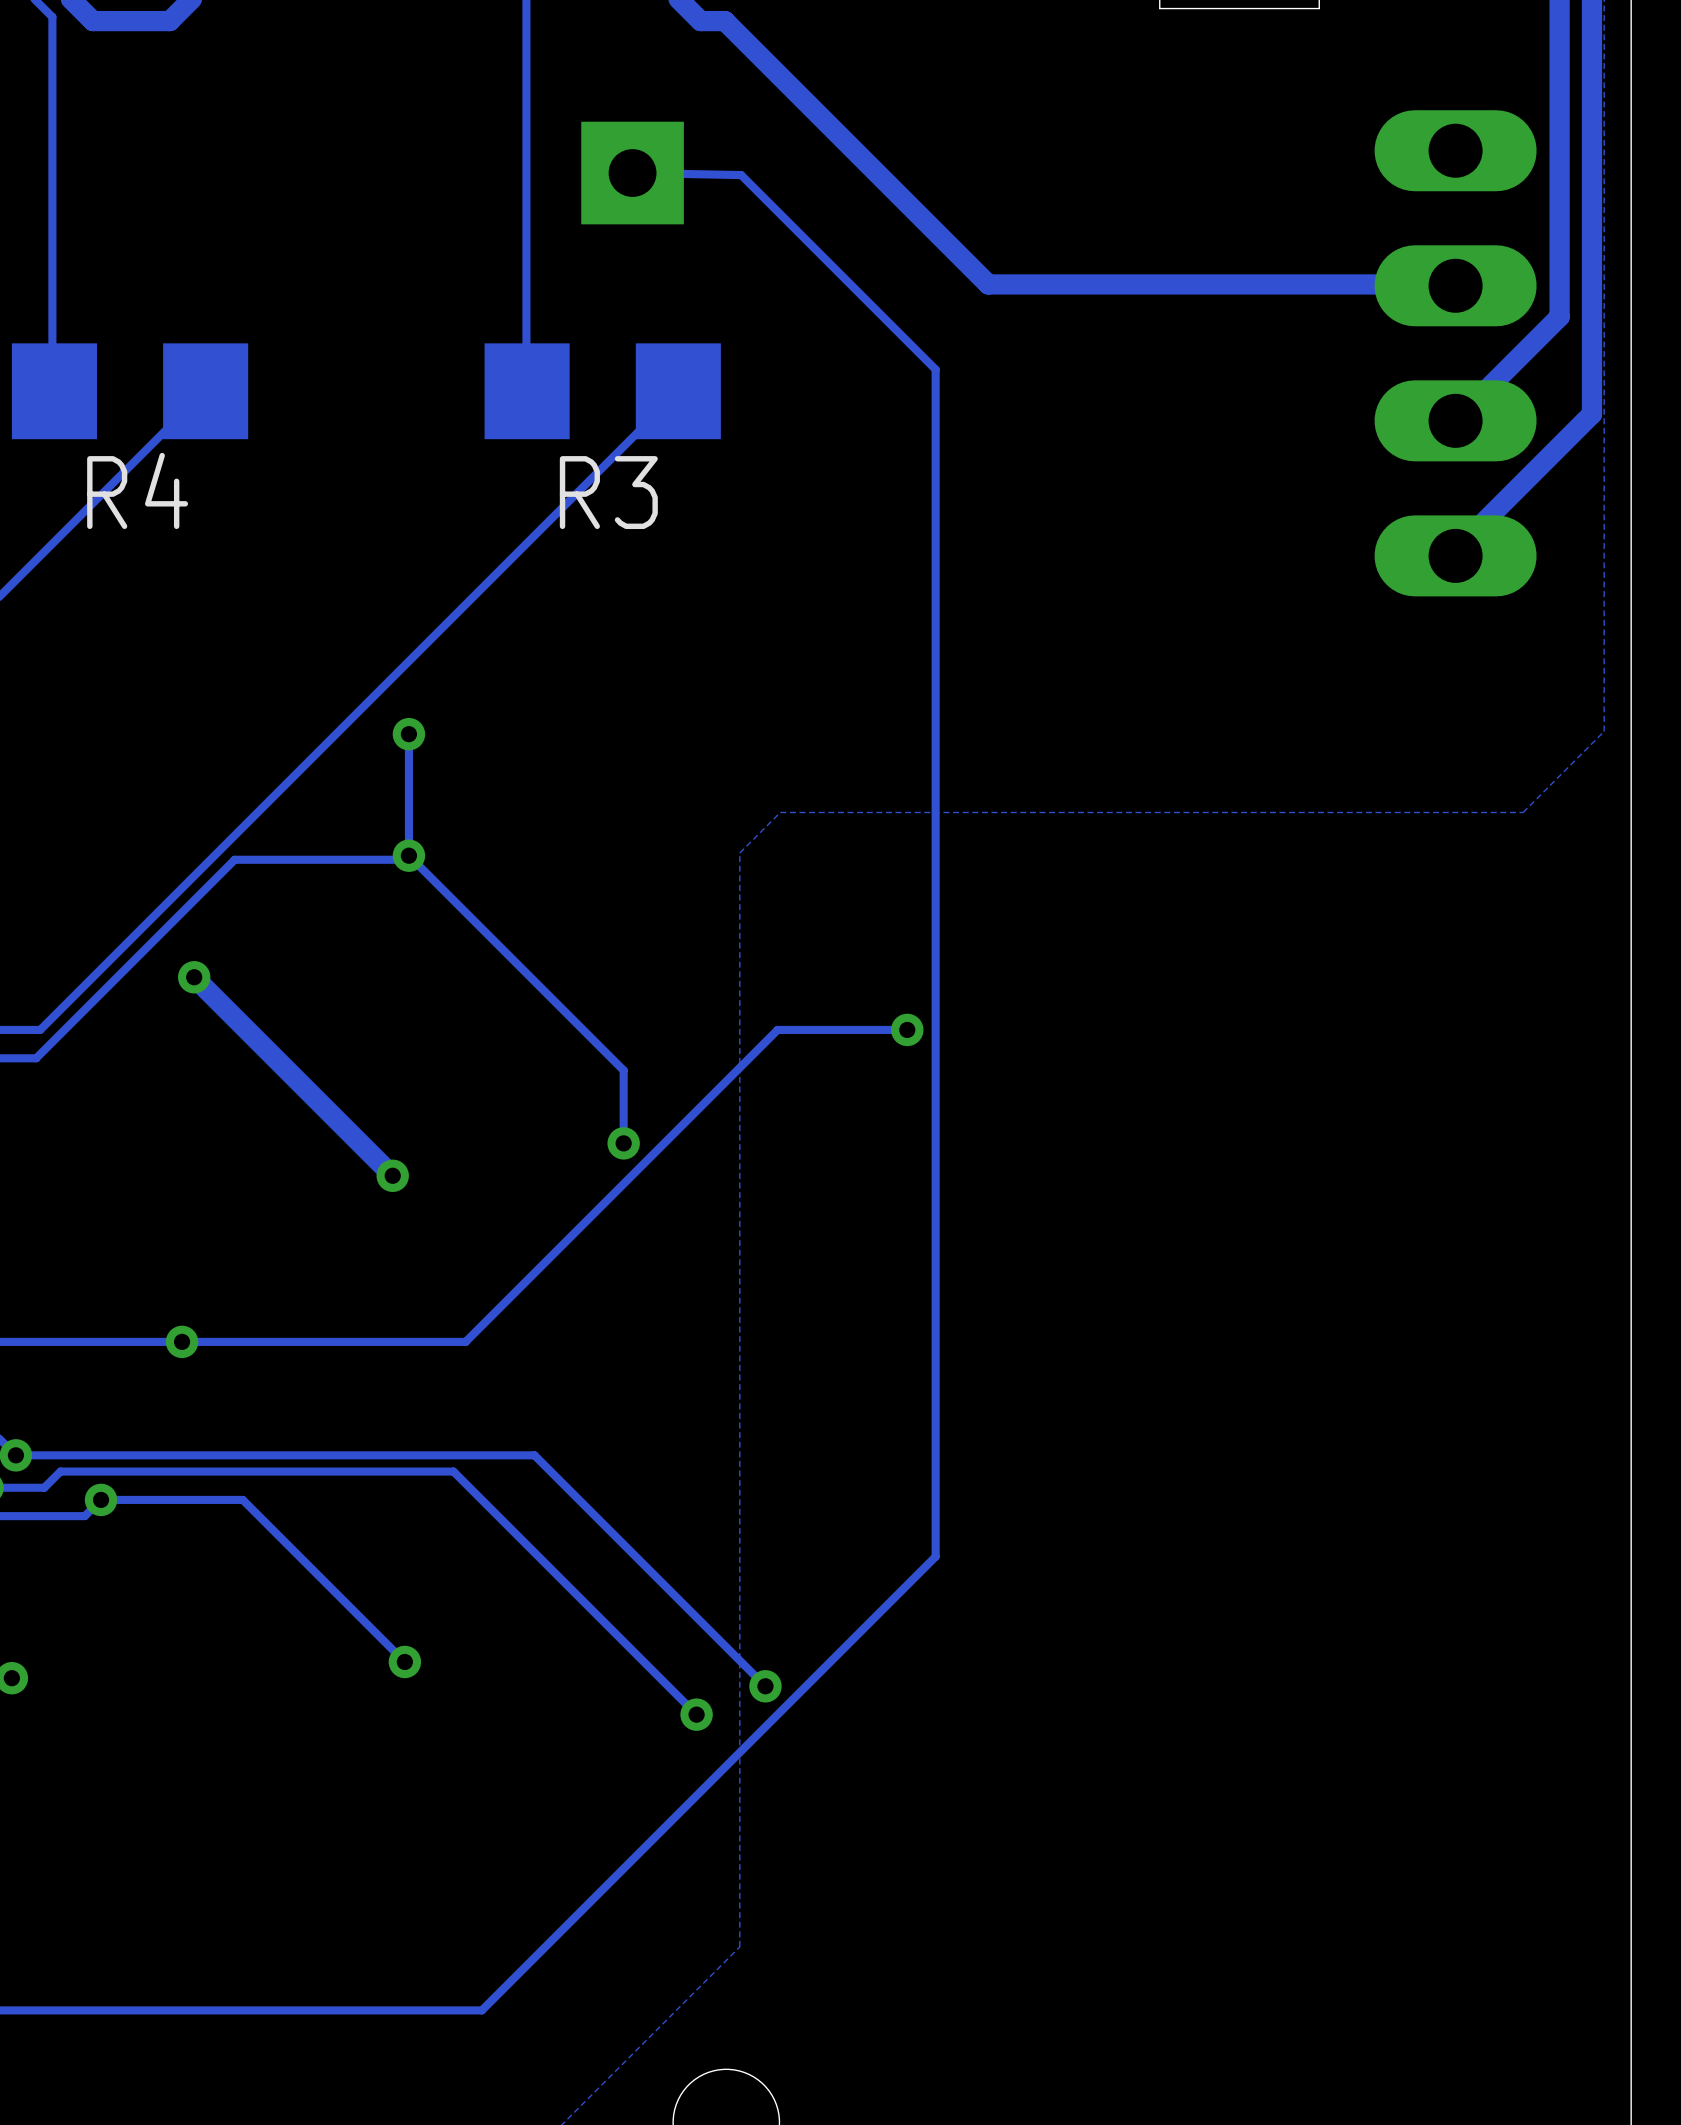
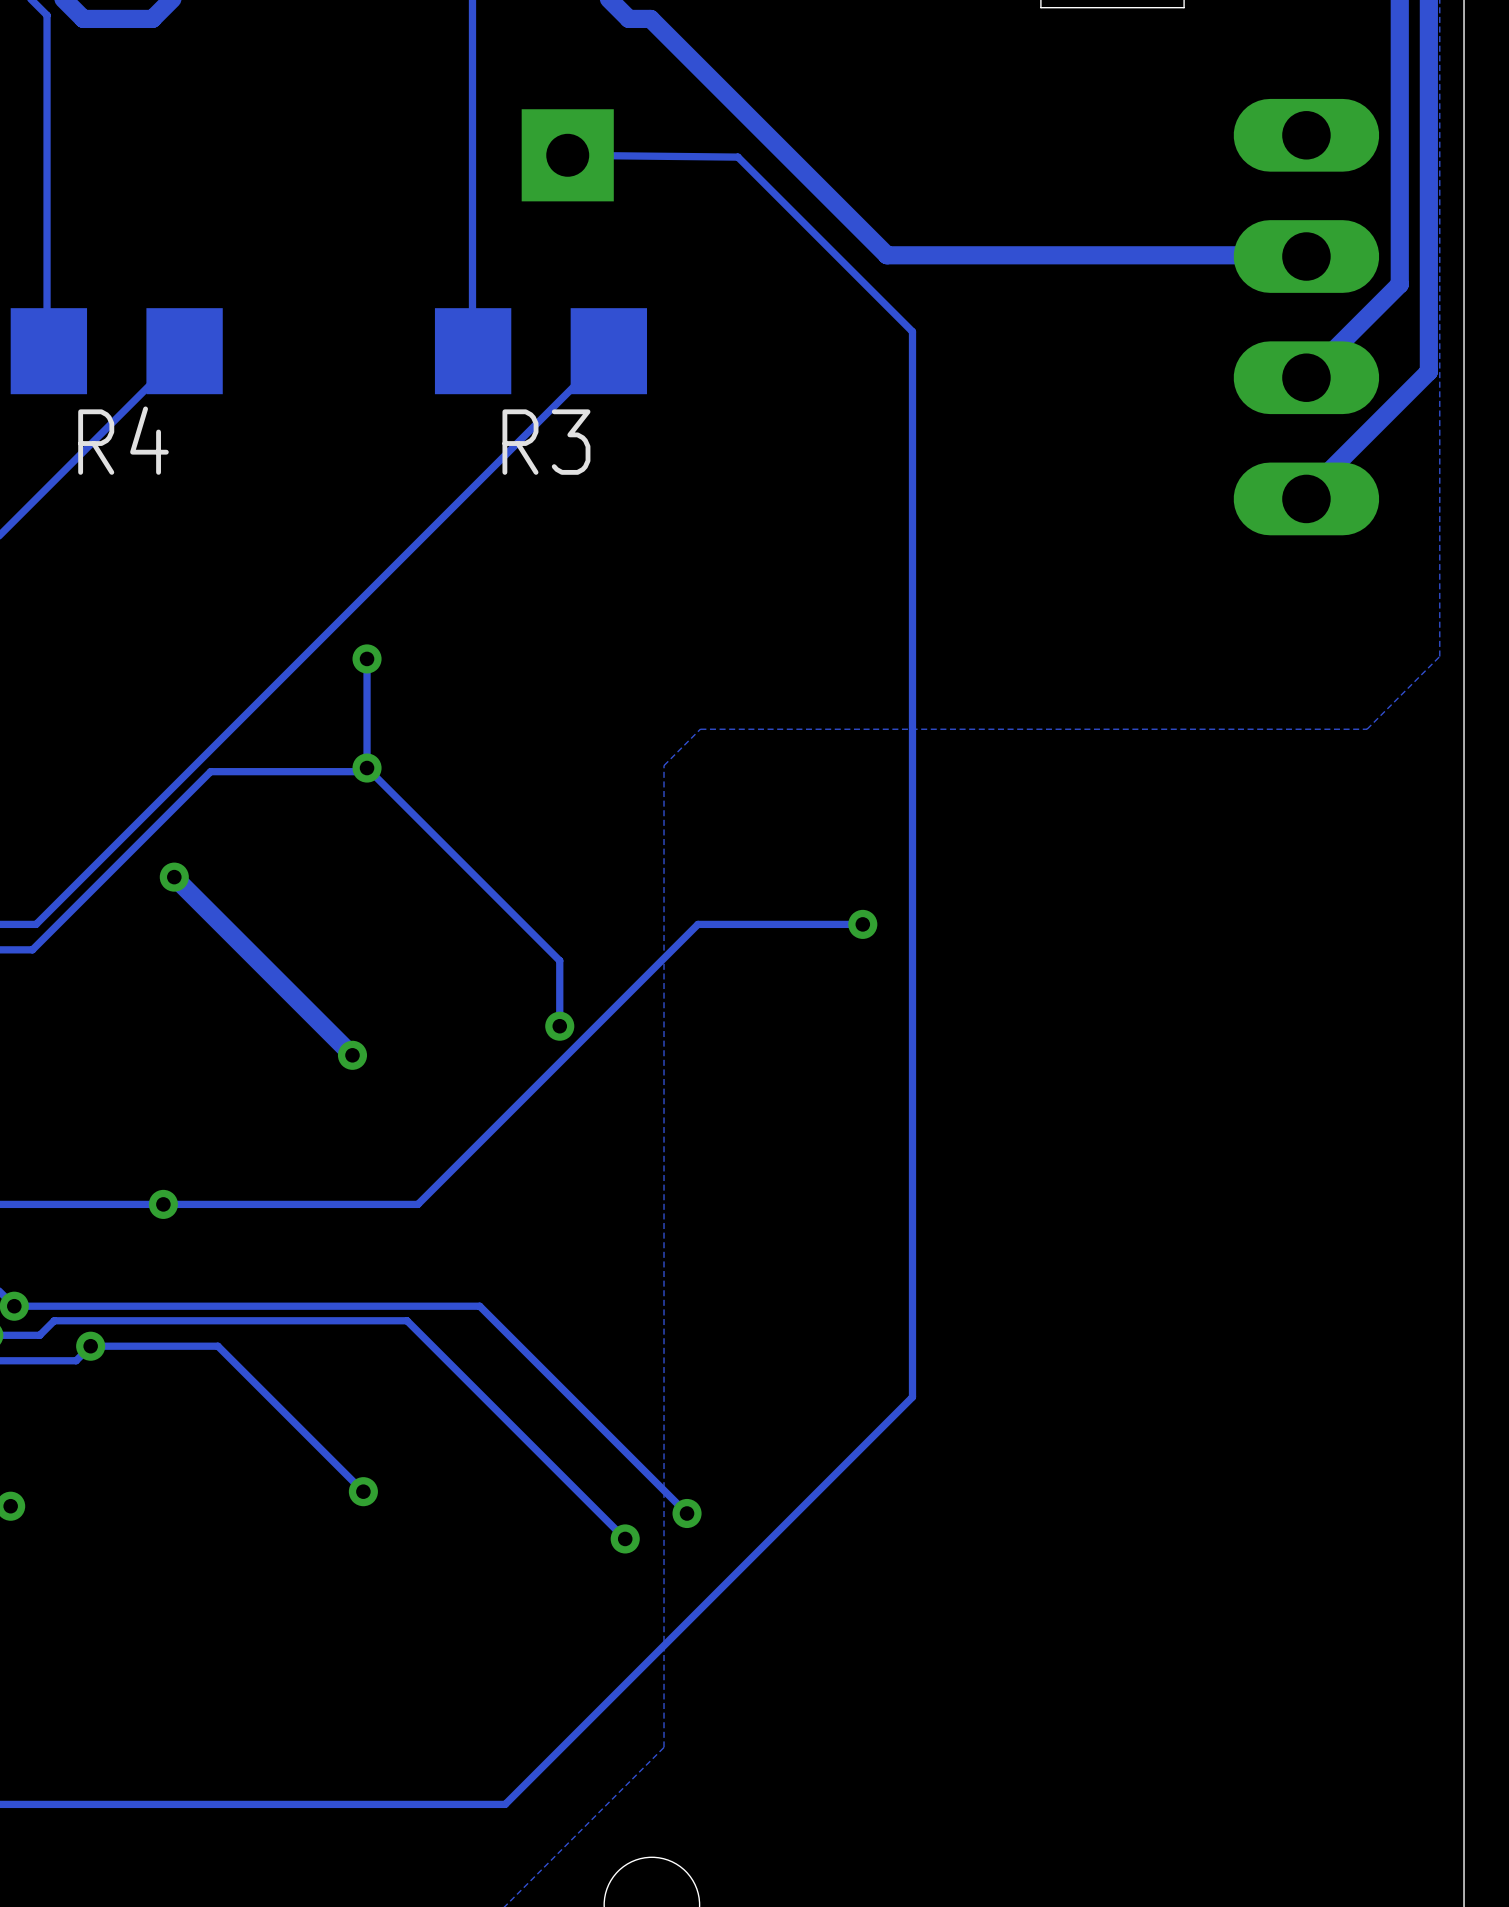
track: (632, 173) (741, 175) (935, 369) (935, 1556) (481, 2010) -> (567, 155) (737, 157) (912, 331) (912, 1397) (505, 1804) (432, 1804)
via position: (907, 1029) -> (862, 924)
track: none -> (862, 924) (814, 924)

